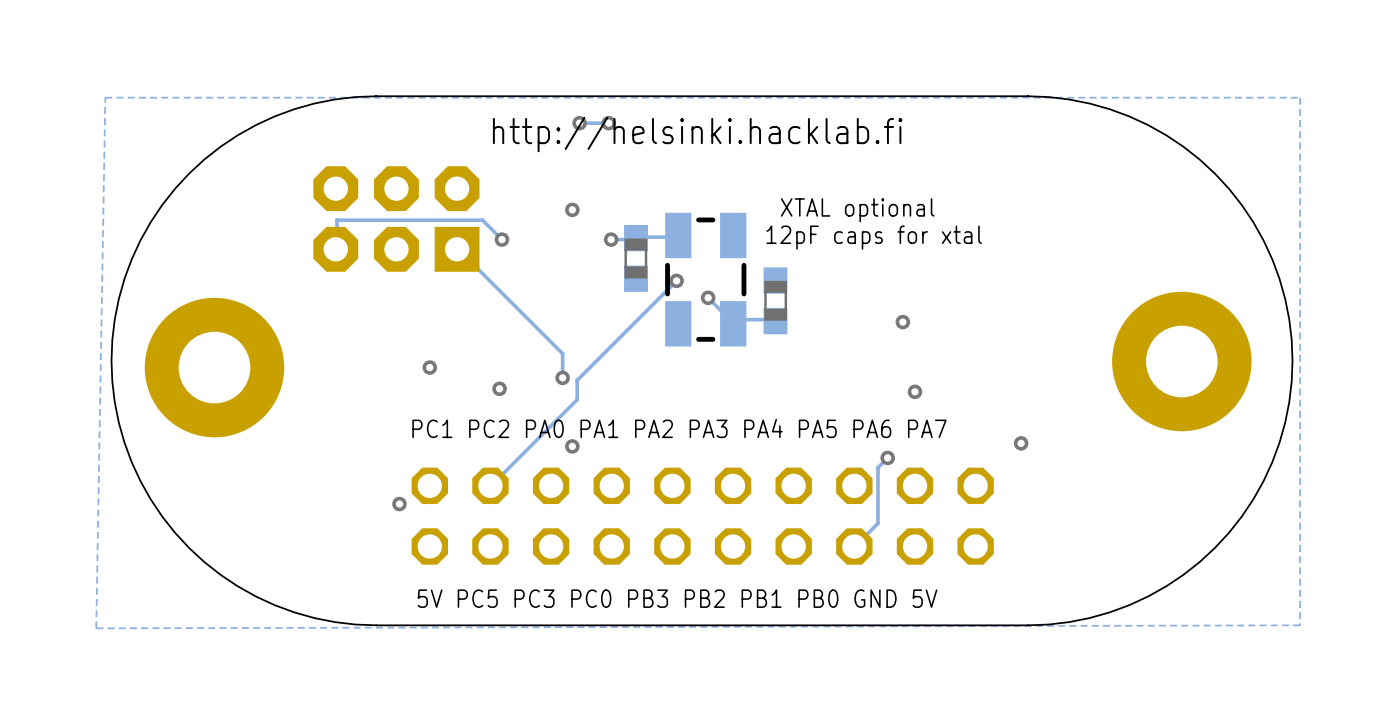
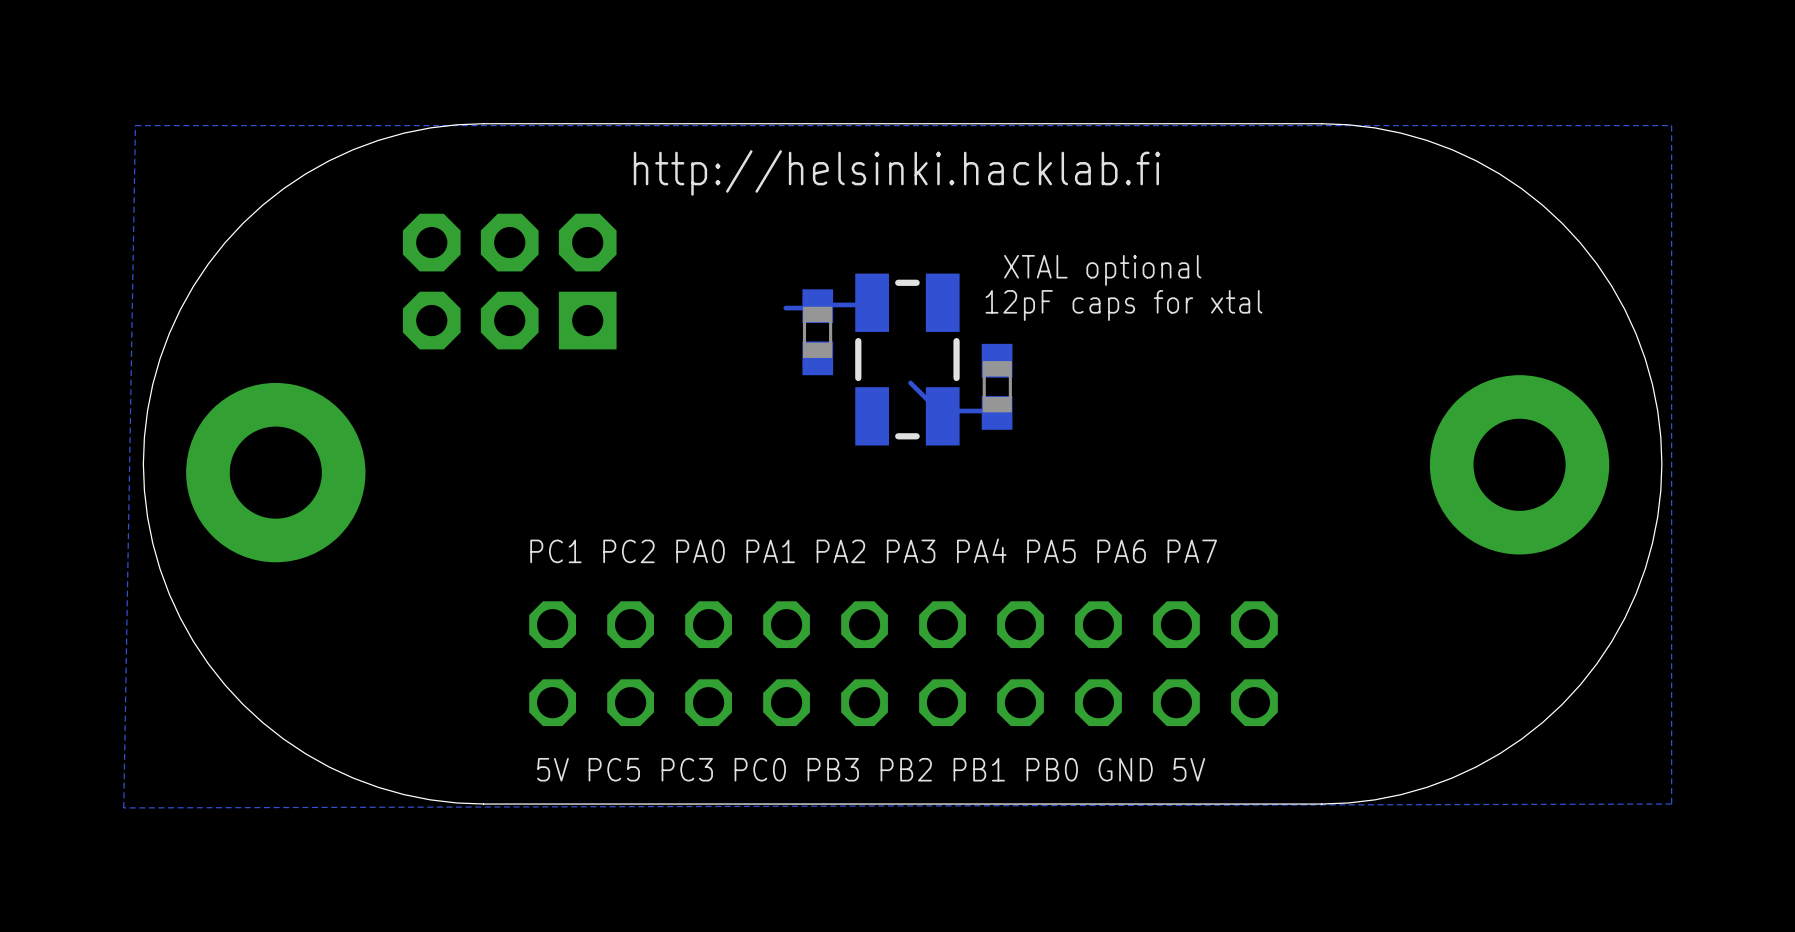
via: (579, 123) -> none
track: (608, 123) (579, 123) -> none
via: (608, 123) -> none
via: (572, 209) -> none
track: (501, 239) (482, 220) (337, 220) (335, 249) -> none
via: (501, 239) -> none
via: (611, 239) -> none
track: (457, 249) (562, 353) (562, 377) -> none
track: (676, 280) (577, 380) (577, 399) (490, 485) -> none
via: (676, 280) -> none
via: (708, 297) -> none
via: (902, 322) -> none
via: (429, 367) -> none
via: (562, 377) -> none
via: (499, 388) -> none
via: (914, 391) -> none
via: (1021, 443) -> none
via: (572, 446) -> none
track: (887, 457) (877, 467) (877, 523) (854, 546) -> none
via: (887, 457) -> none
via: (399, 504) -> none

